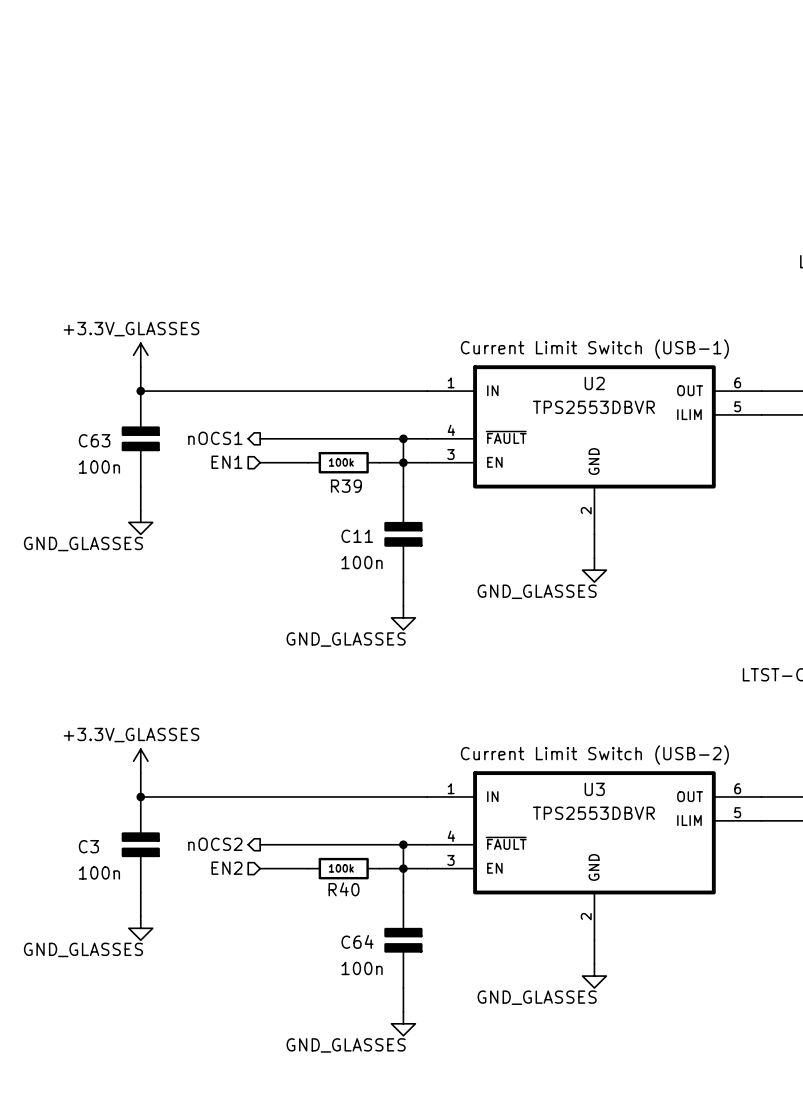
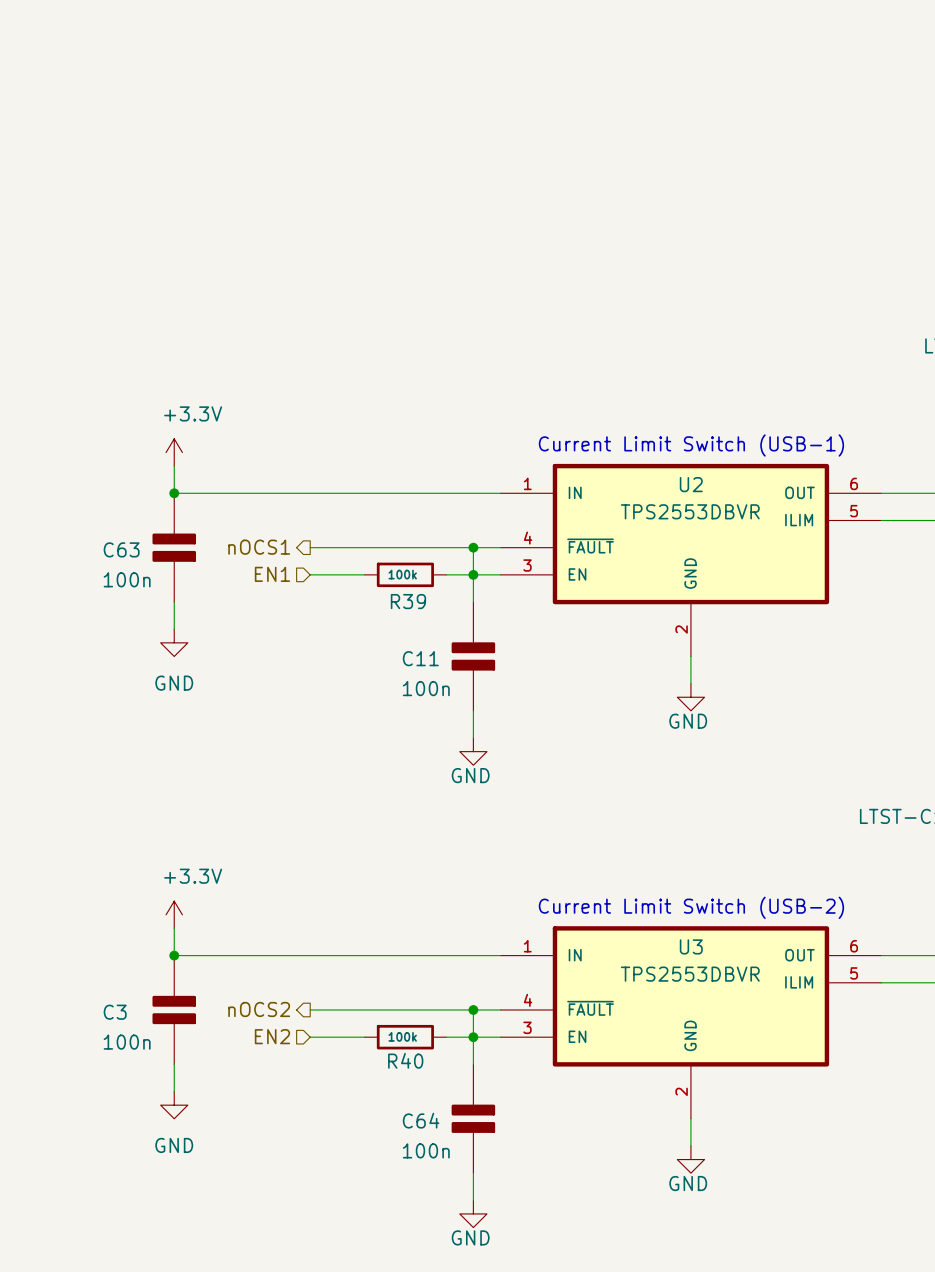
power symbol: +3.3V_GLASSES (140, 355) -> +3.3V (174, 452)
power symbol: GND_GLASSES (140, 522) -> GND (174, 642)
power symbol: GND_GLASSES (594, 570) -> GND (690, 697)
power symbol: GND_GLASSES (403, 617) -> GND (473, 751)
power symbol: +3.3V_GLASSES (140, 761) -> +3.3V (174, 914)
power symbol: GND_GLASSES (140, 928) -> GND (174, 1105)
power symbol: GND_GLASSES (594, 976) -> GND (690, 1159)
power symbol: GND_GLASSES (403, 1023) -> GND (473, 1213)

